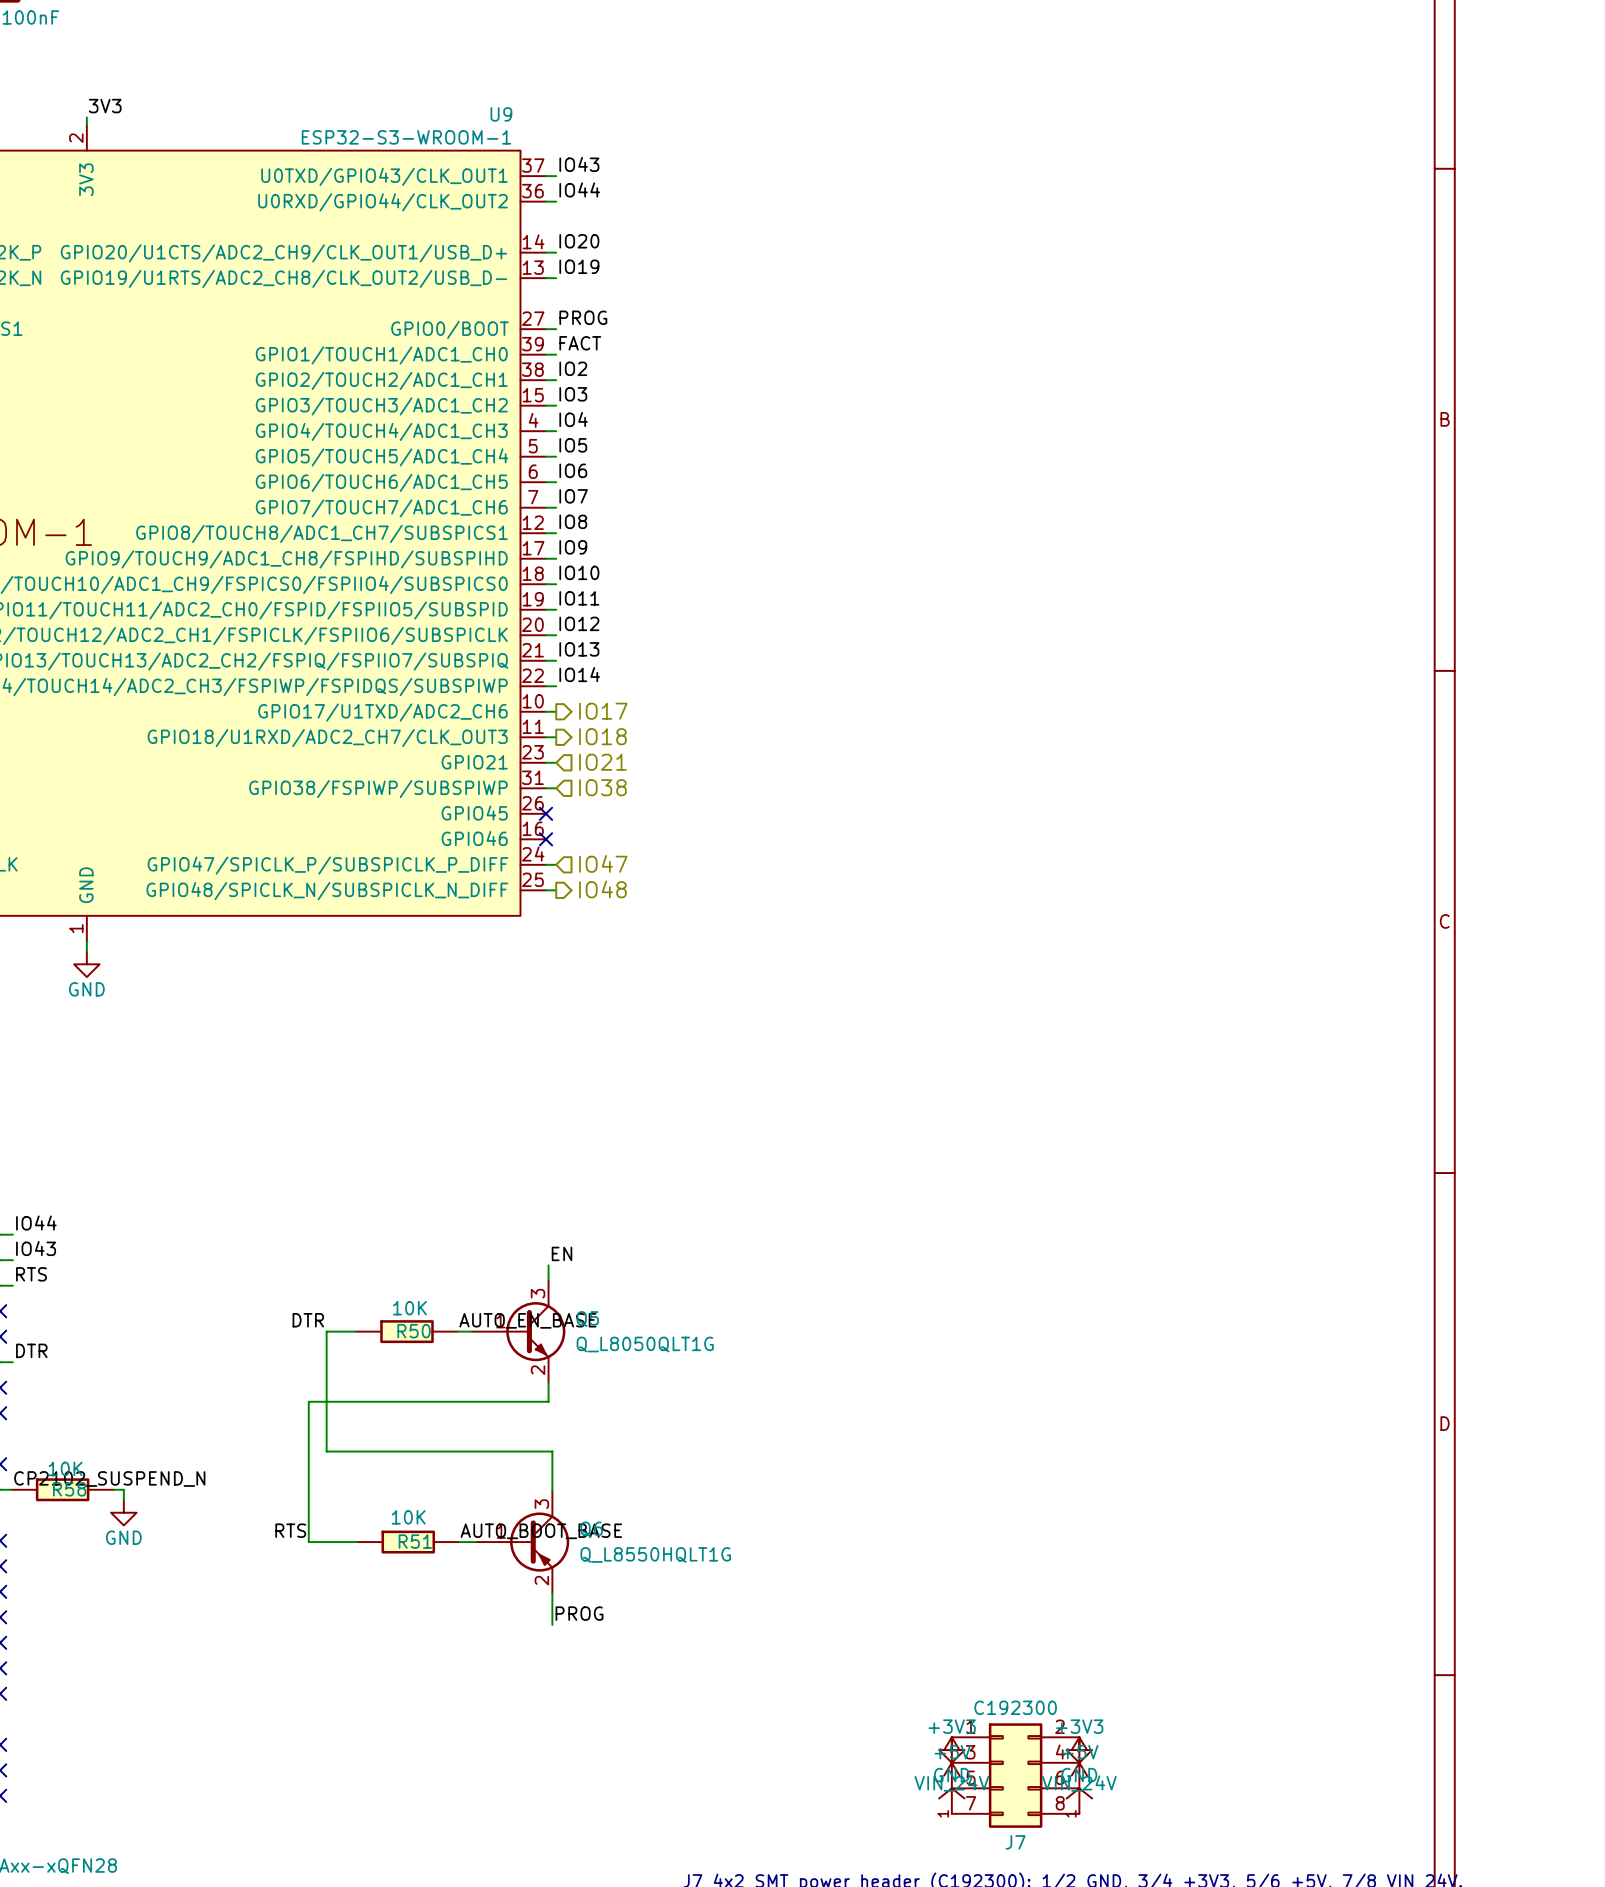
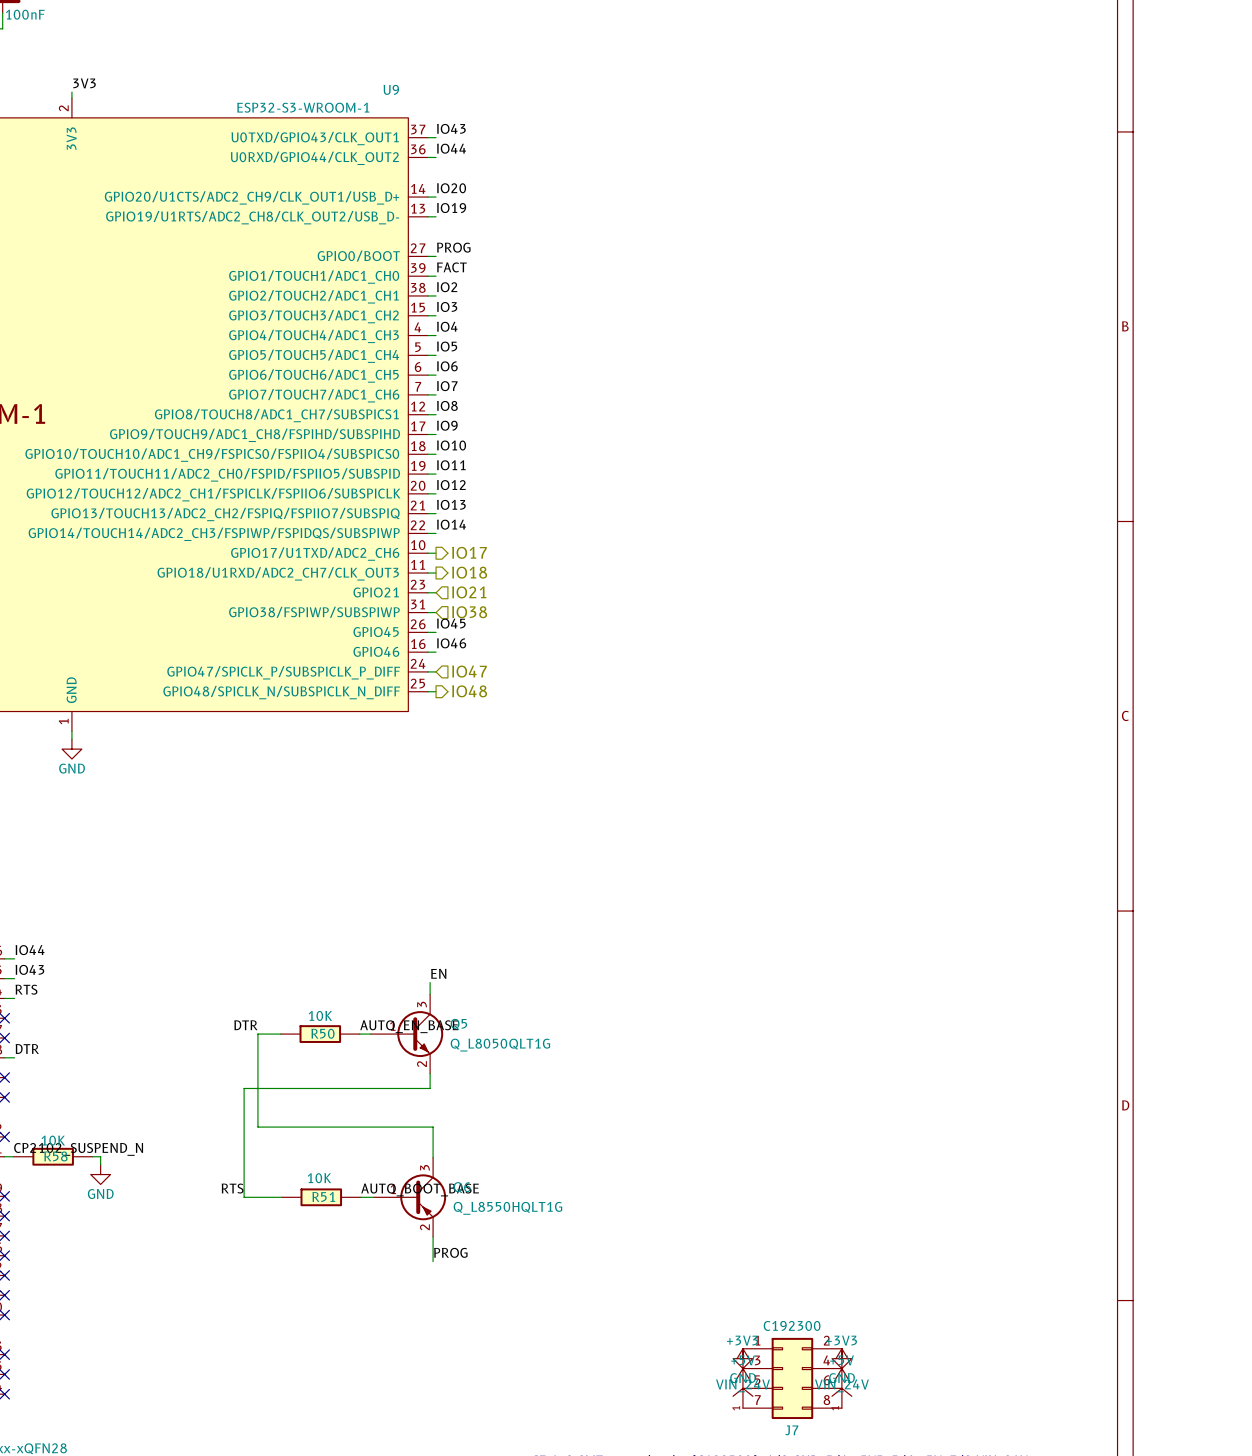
label: none -> IO45 (451, 623)
wire: none -> (428, 632) (436, 632)
no-connect mark: (546, 813) -> none
label: none -> IO46 (451, 643)
wire: none -> (428, 652) (436, 652)
no-connect mark: (546, 839) -> none

